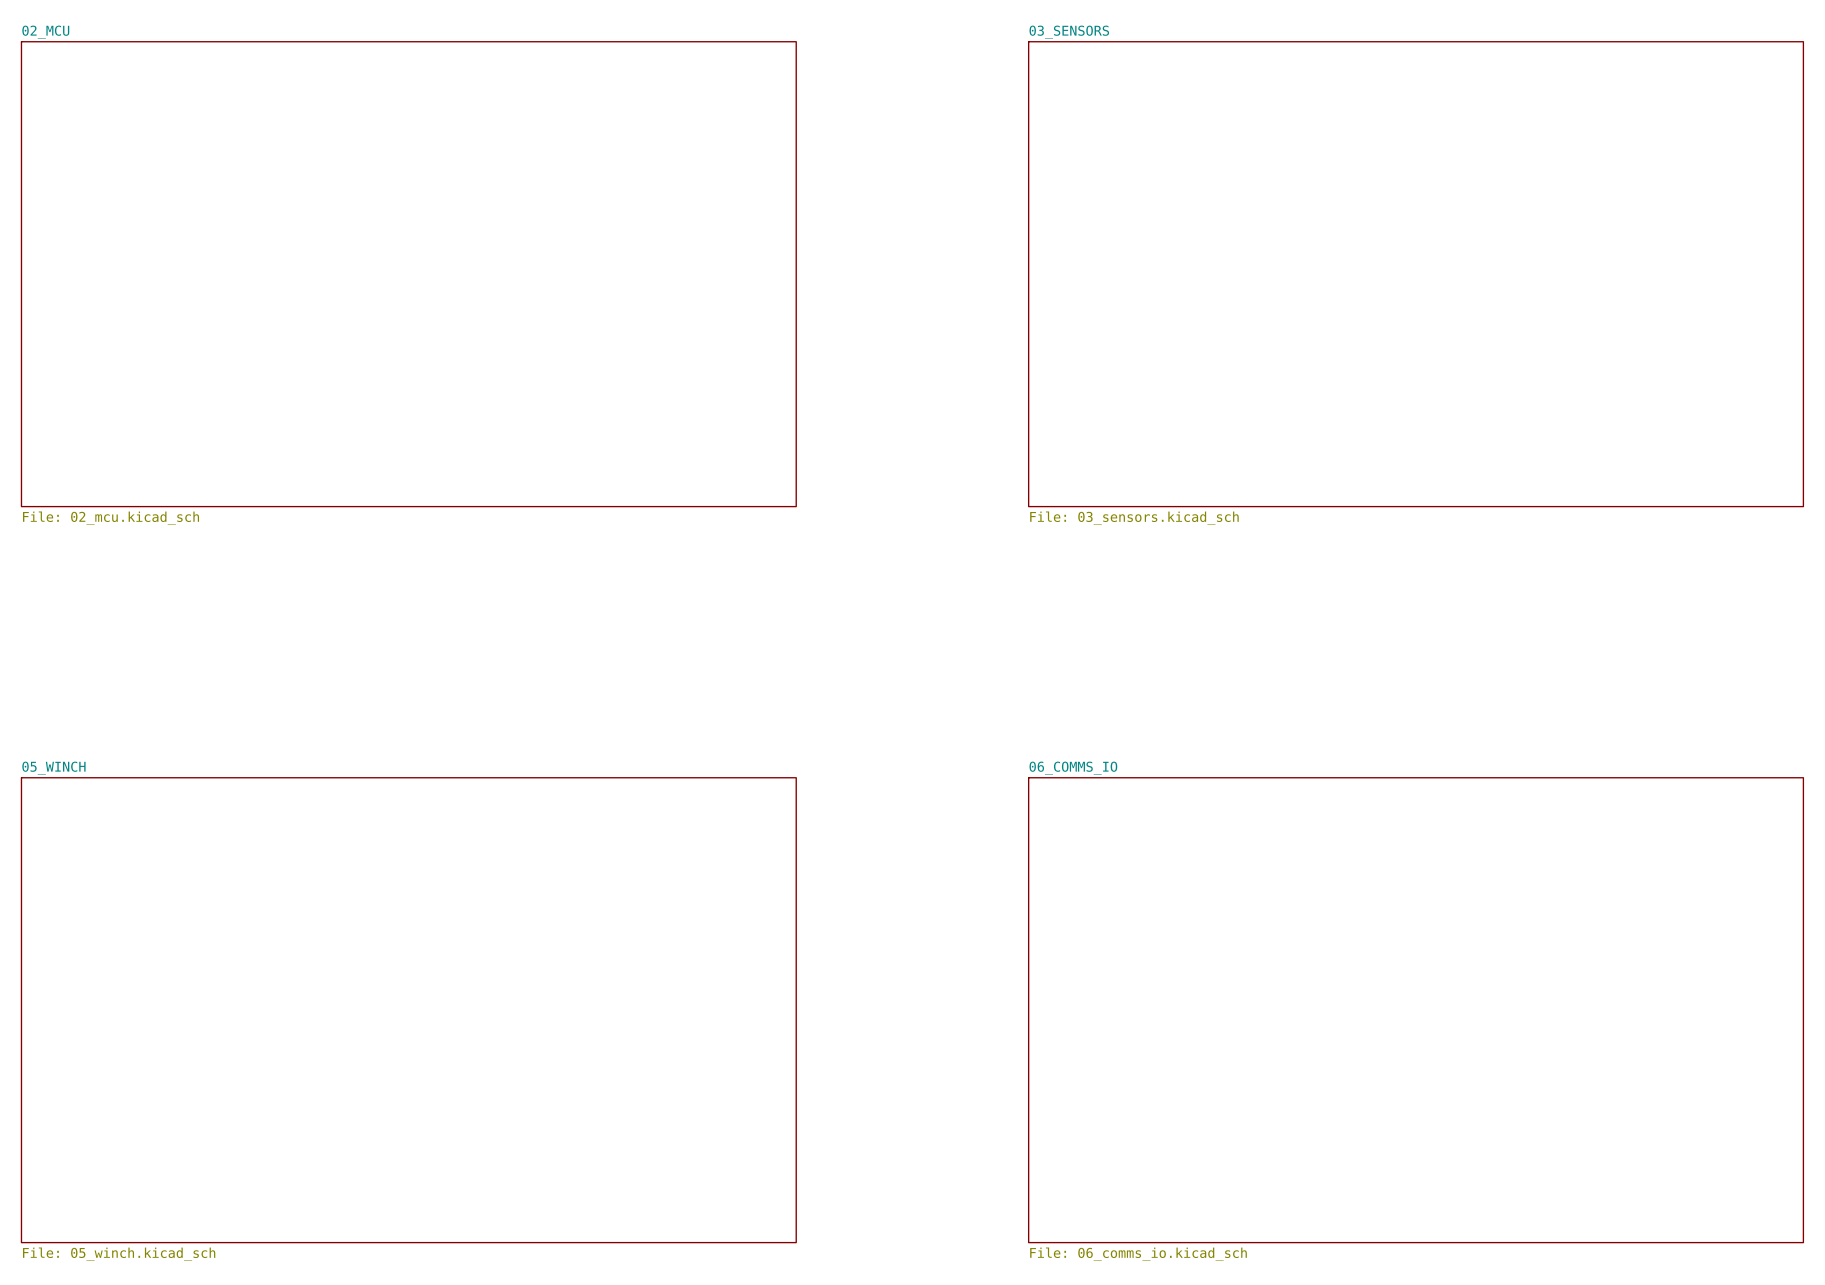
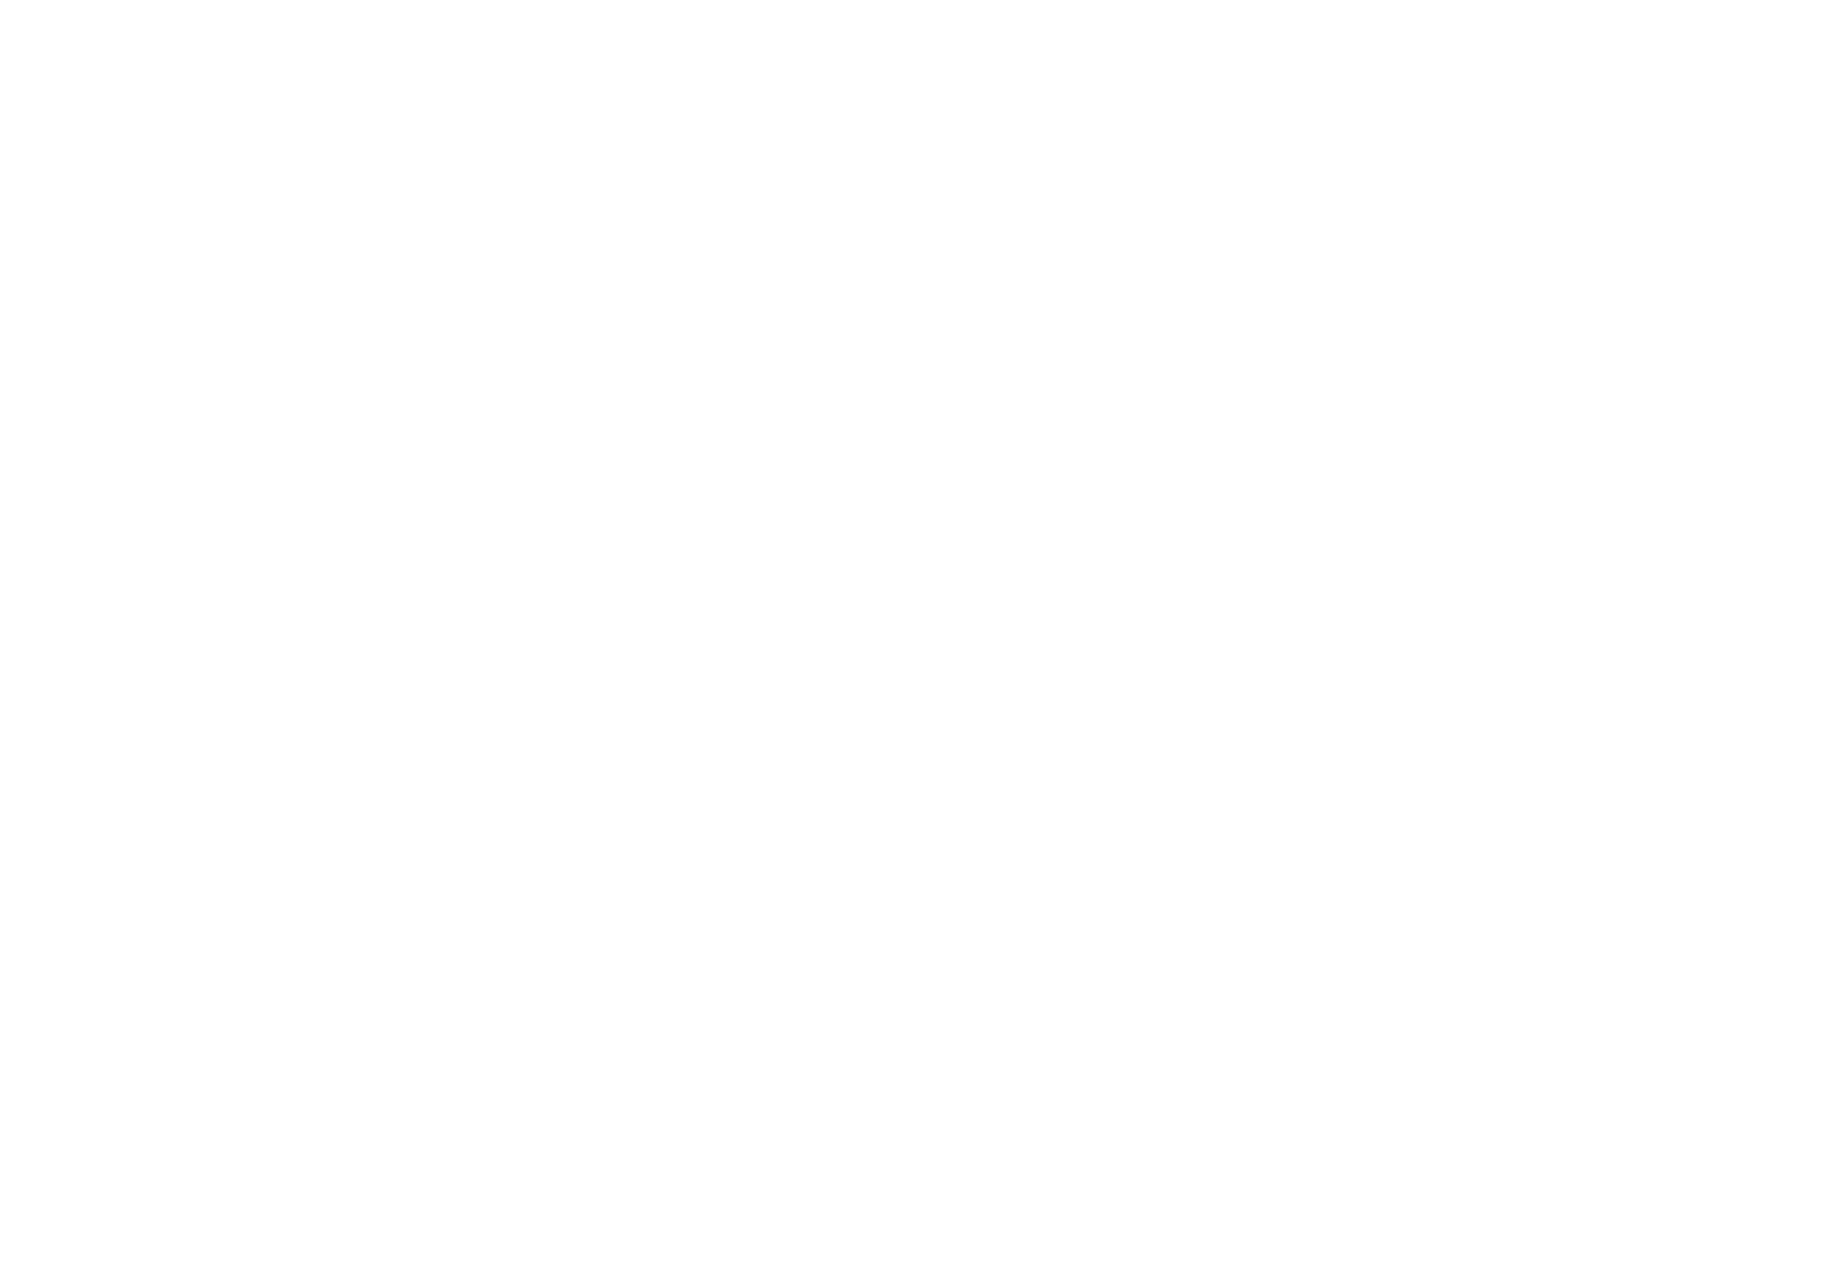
sheet 02_MCU: File: 02_mcu.kicad_sch (408, 274) -> none
sheet 03_SENSORS: File: 03_sensors.kicad_sch (1416, 274) -> none
sheet 05_WINCH: File: 05_winch.kicad_sch (408, 1010) -> none
sheet 06_COMMS_IO: File: 06_comms_io.kicad_sch (1416, 1010) -> none

